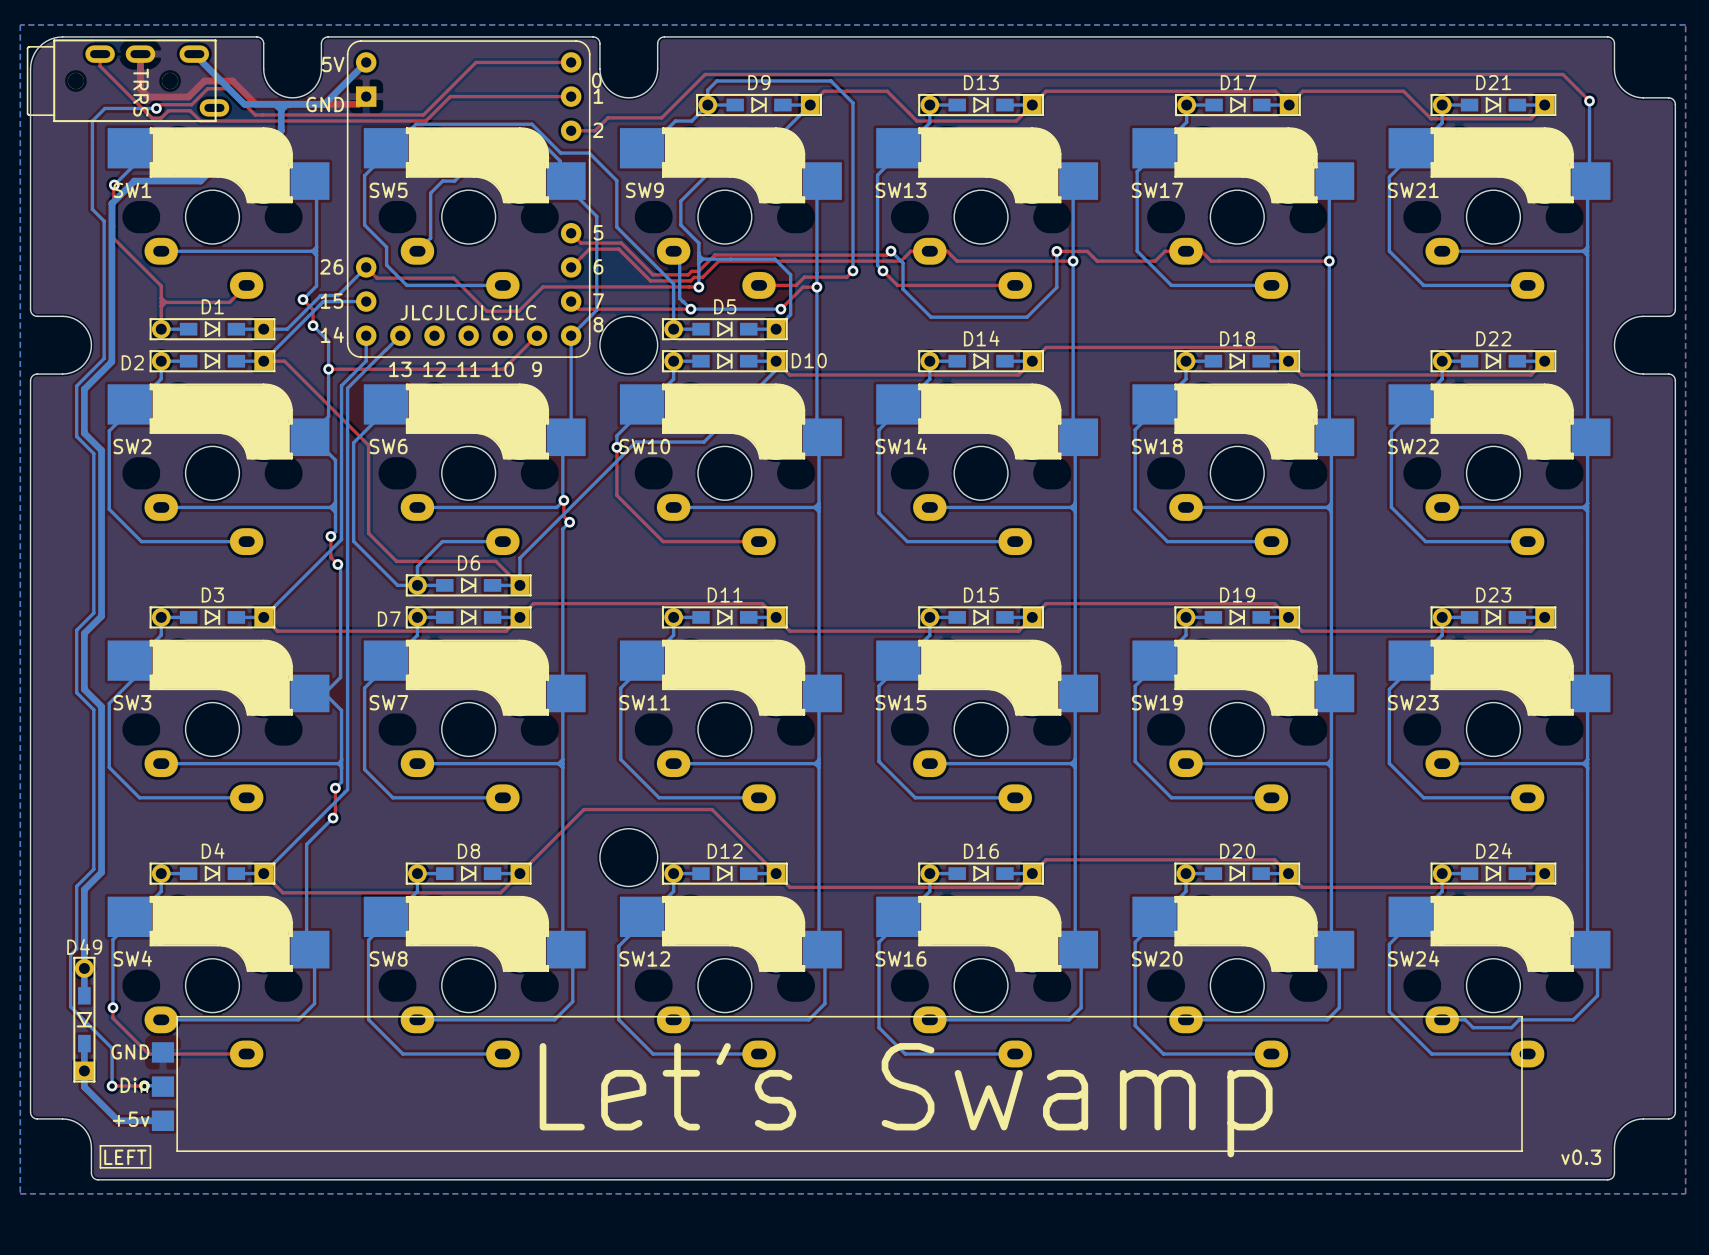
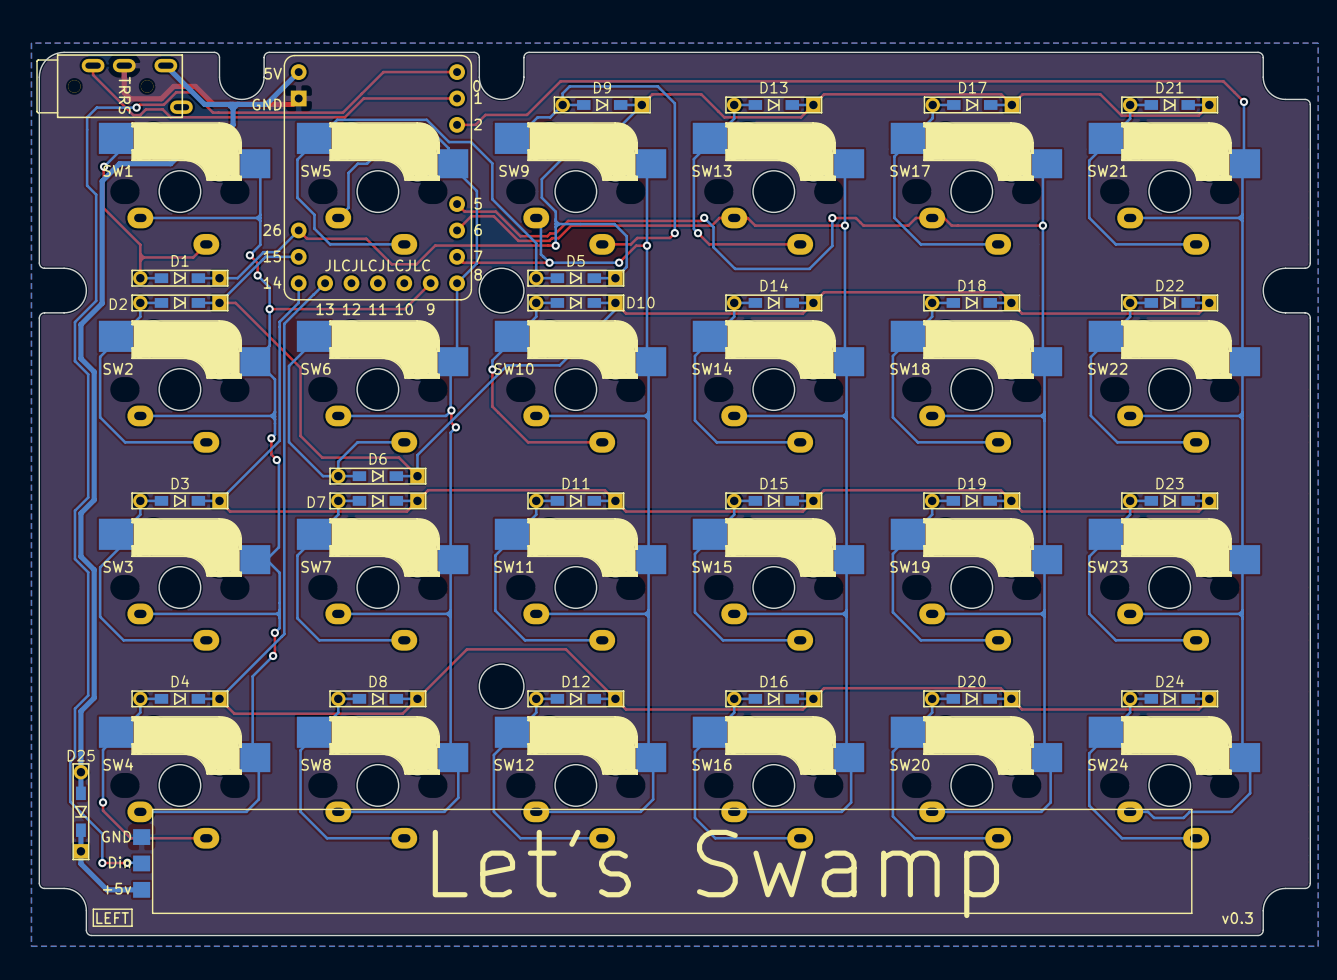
D49 name: D49 (84, 946) -> D25 (81, 755)

